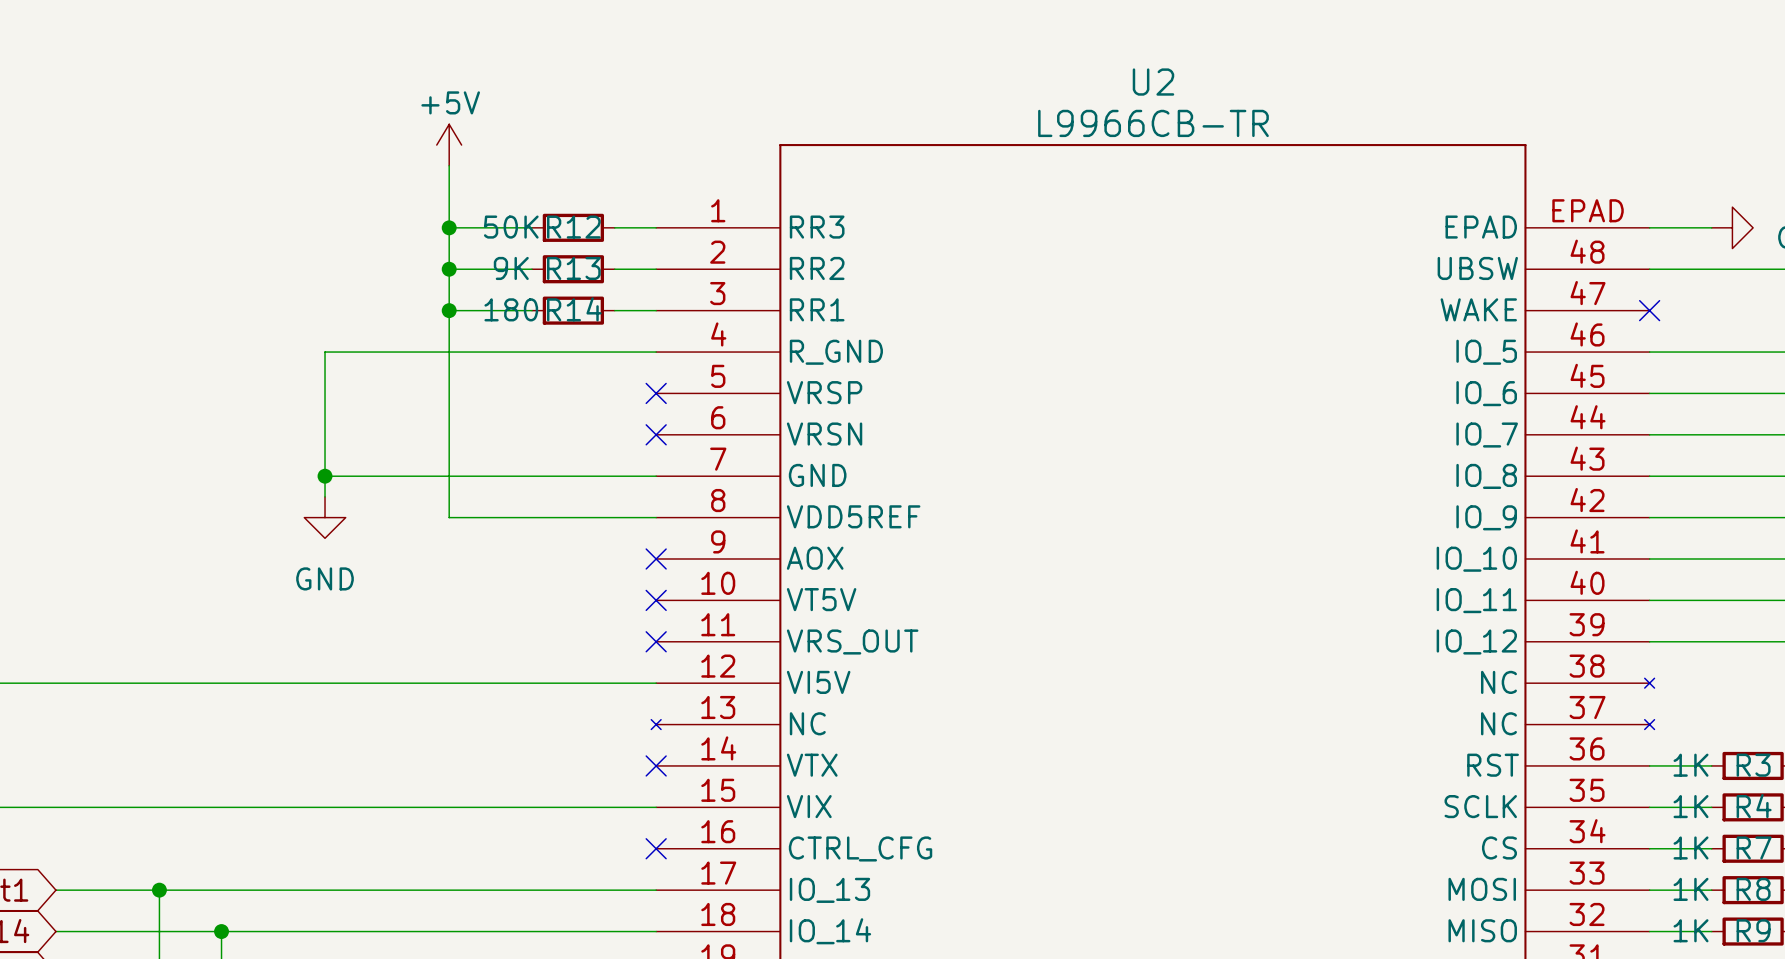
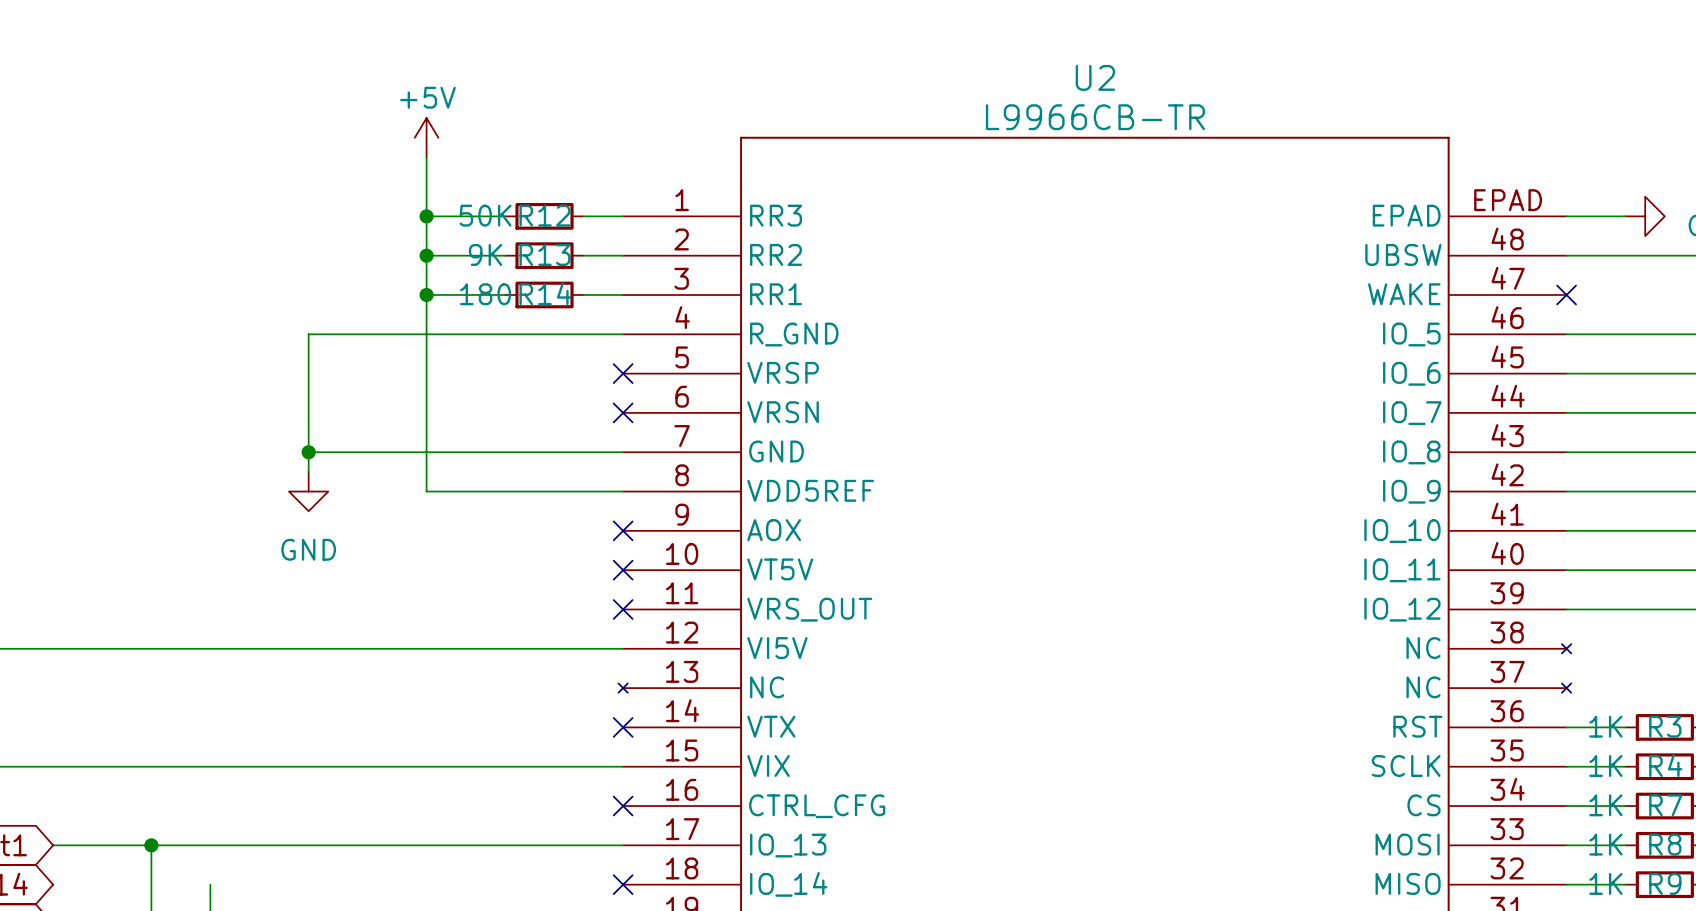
wire: (55, 931) (656, 931) -> none
junction: (221, 931) -> none
no-connect mark: none -> (623, 884)

